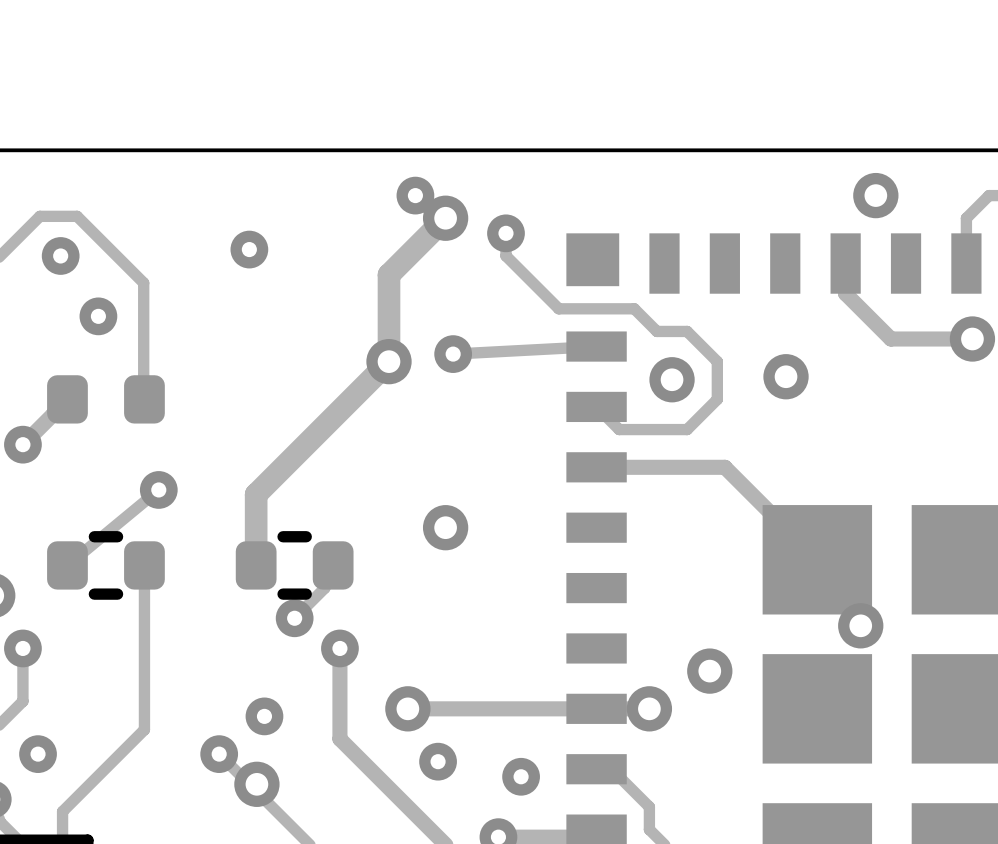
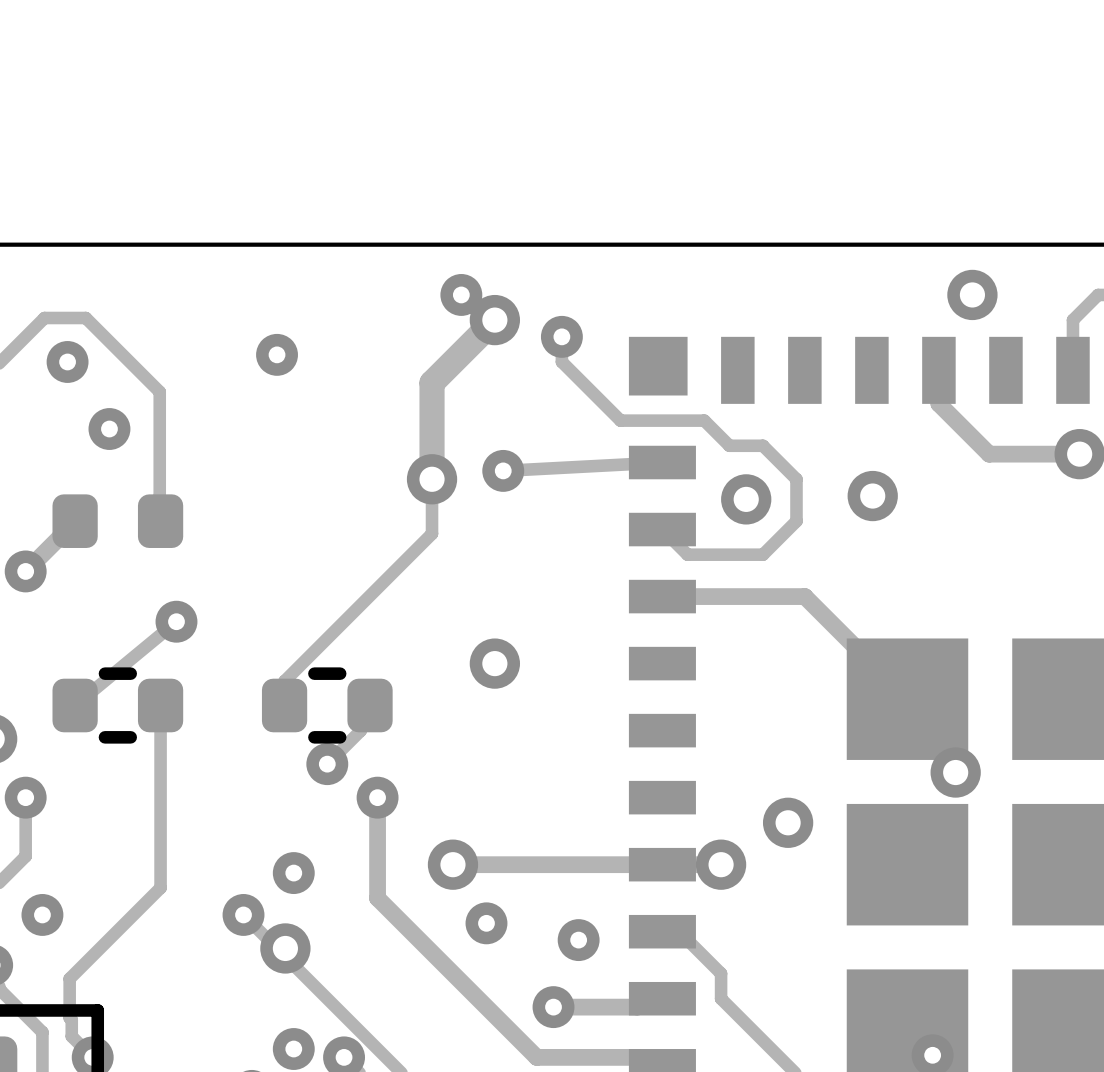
track: (389, 361) (256, 494) (256, 565) -> (432, 479) (432, 533) (284, 681)

